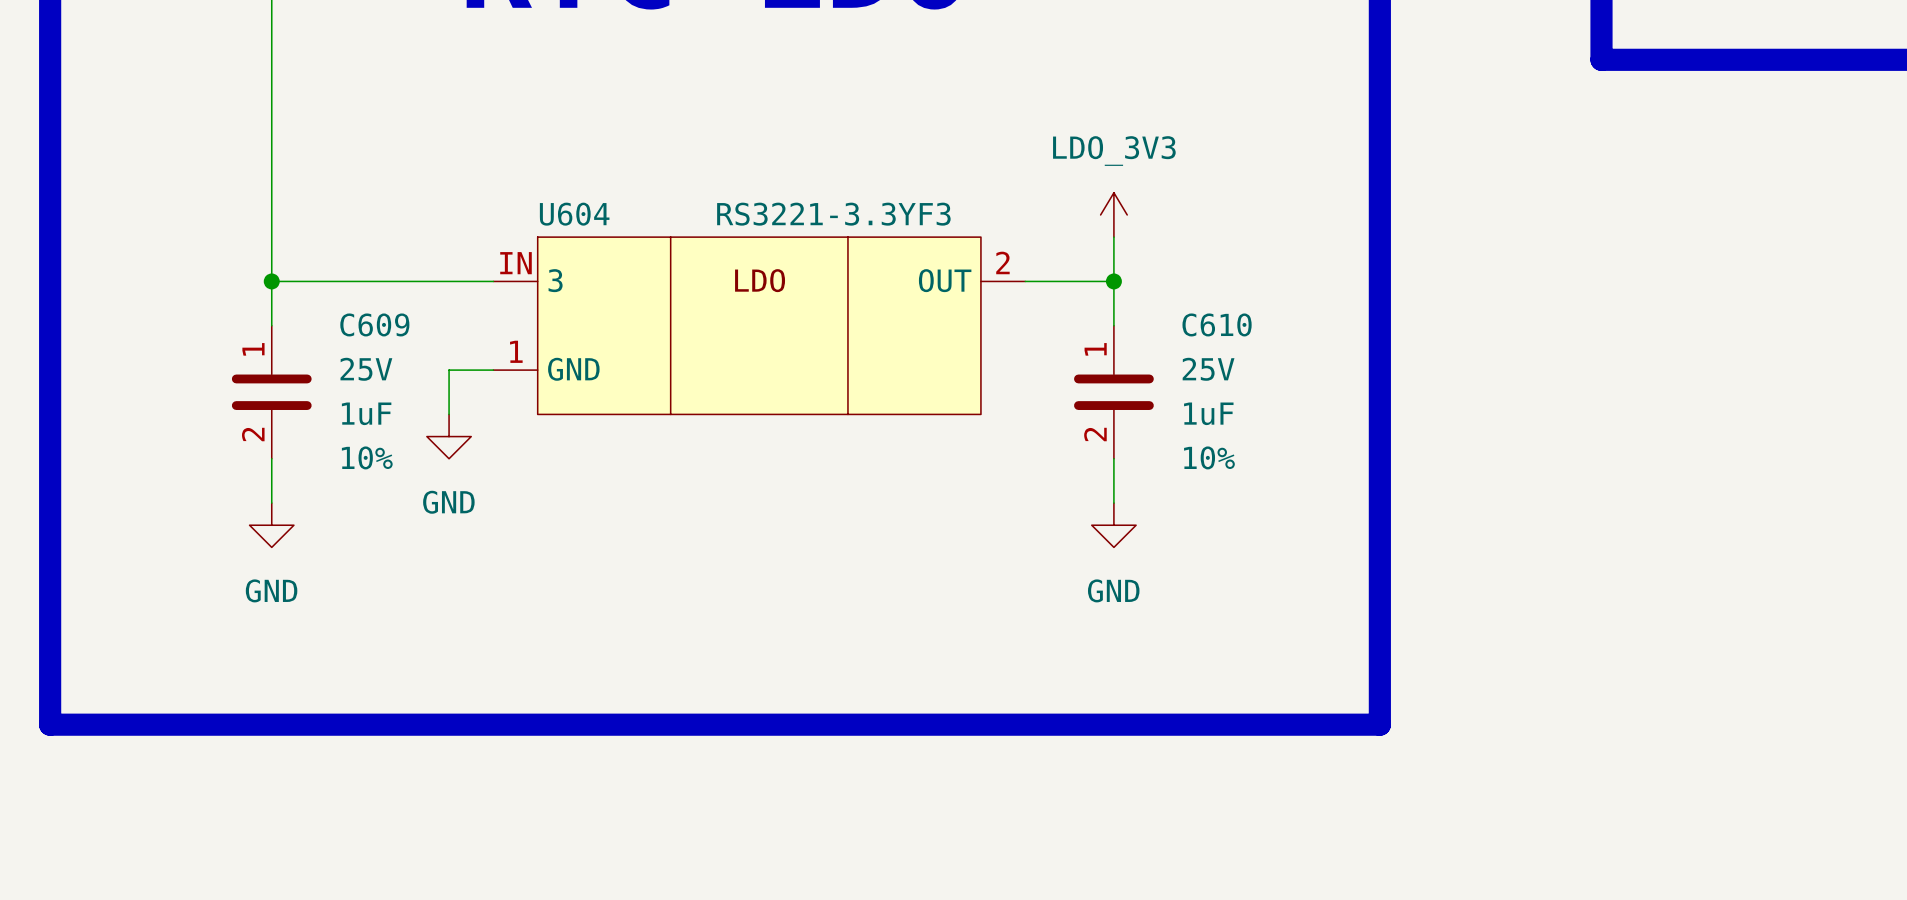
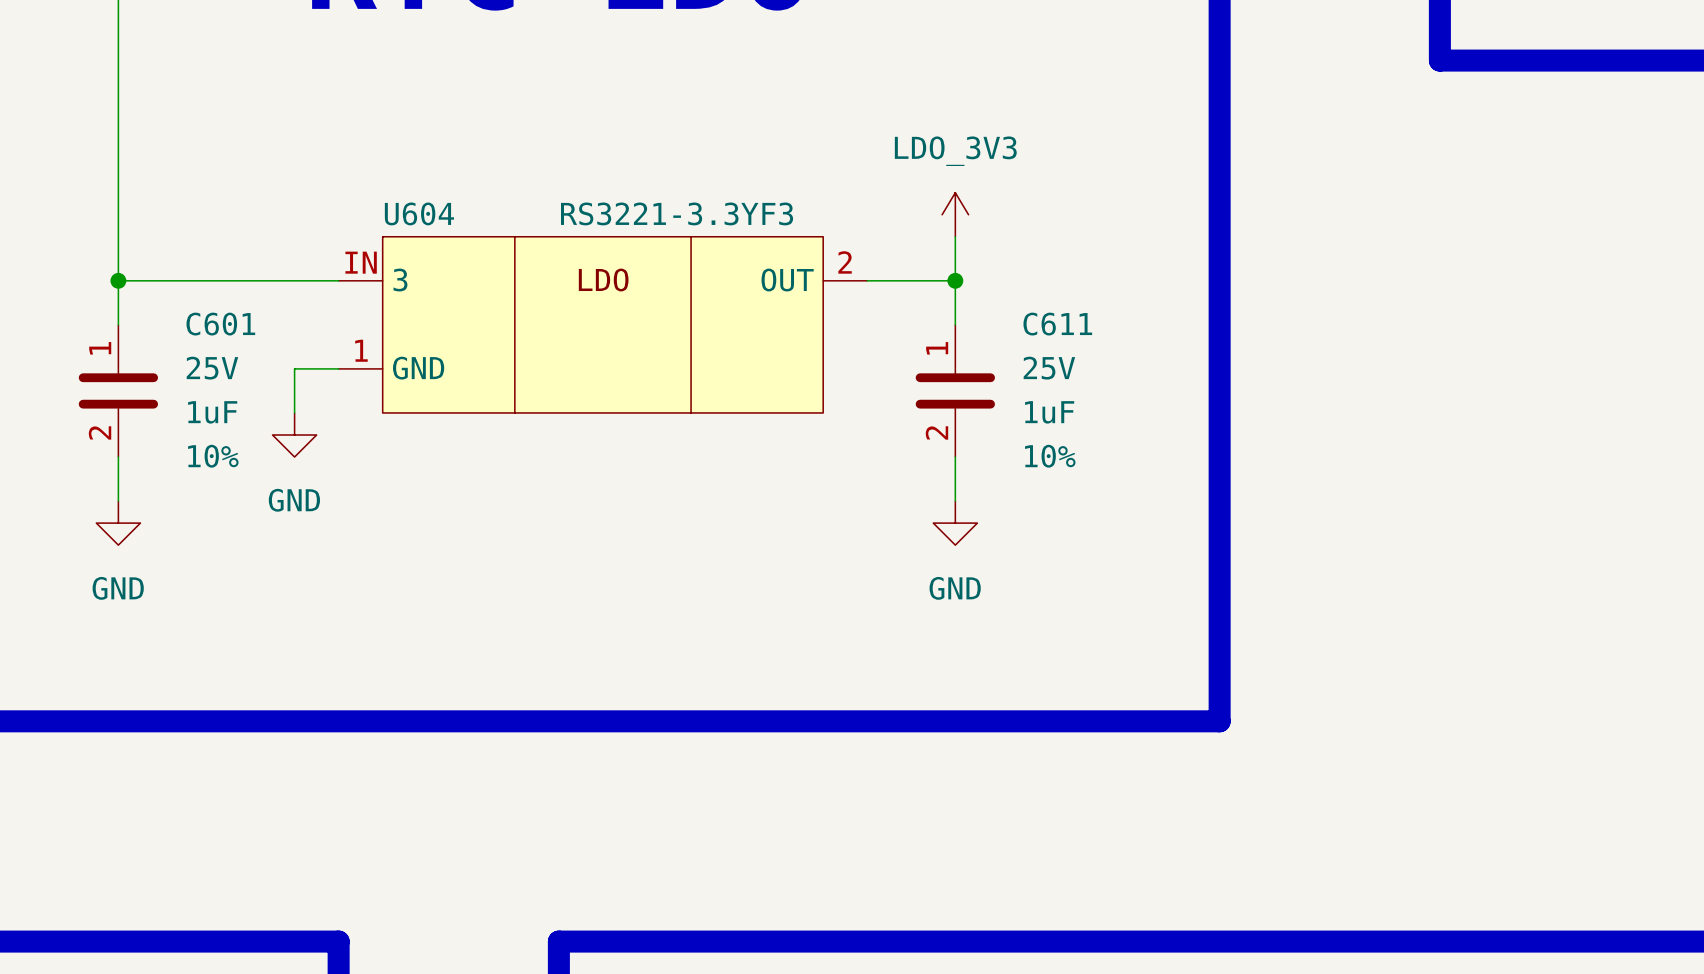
C609 name: C609 (374, 324) -> C601 (220, 324)
C610 name: C610 (1217, 324) -> C611 (1057, 324)

